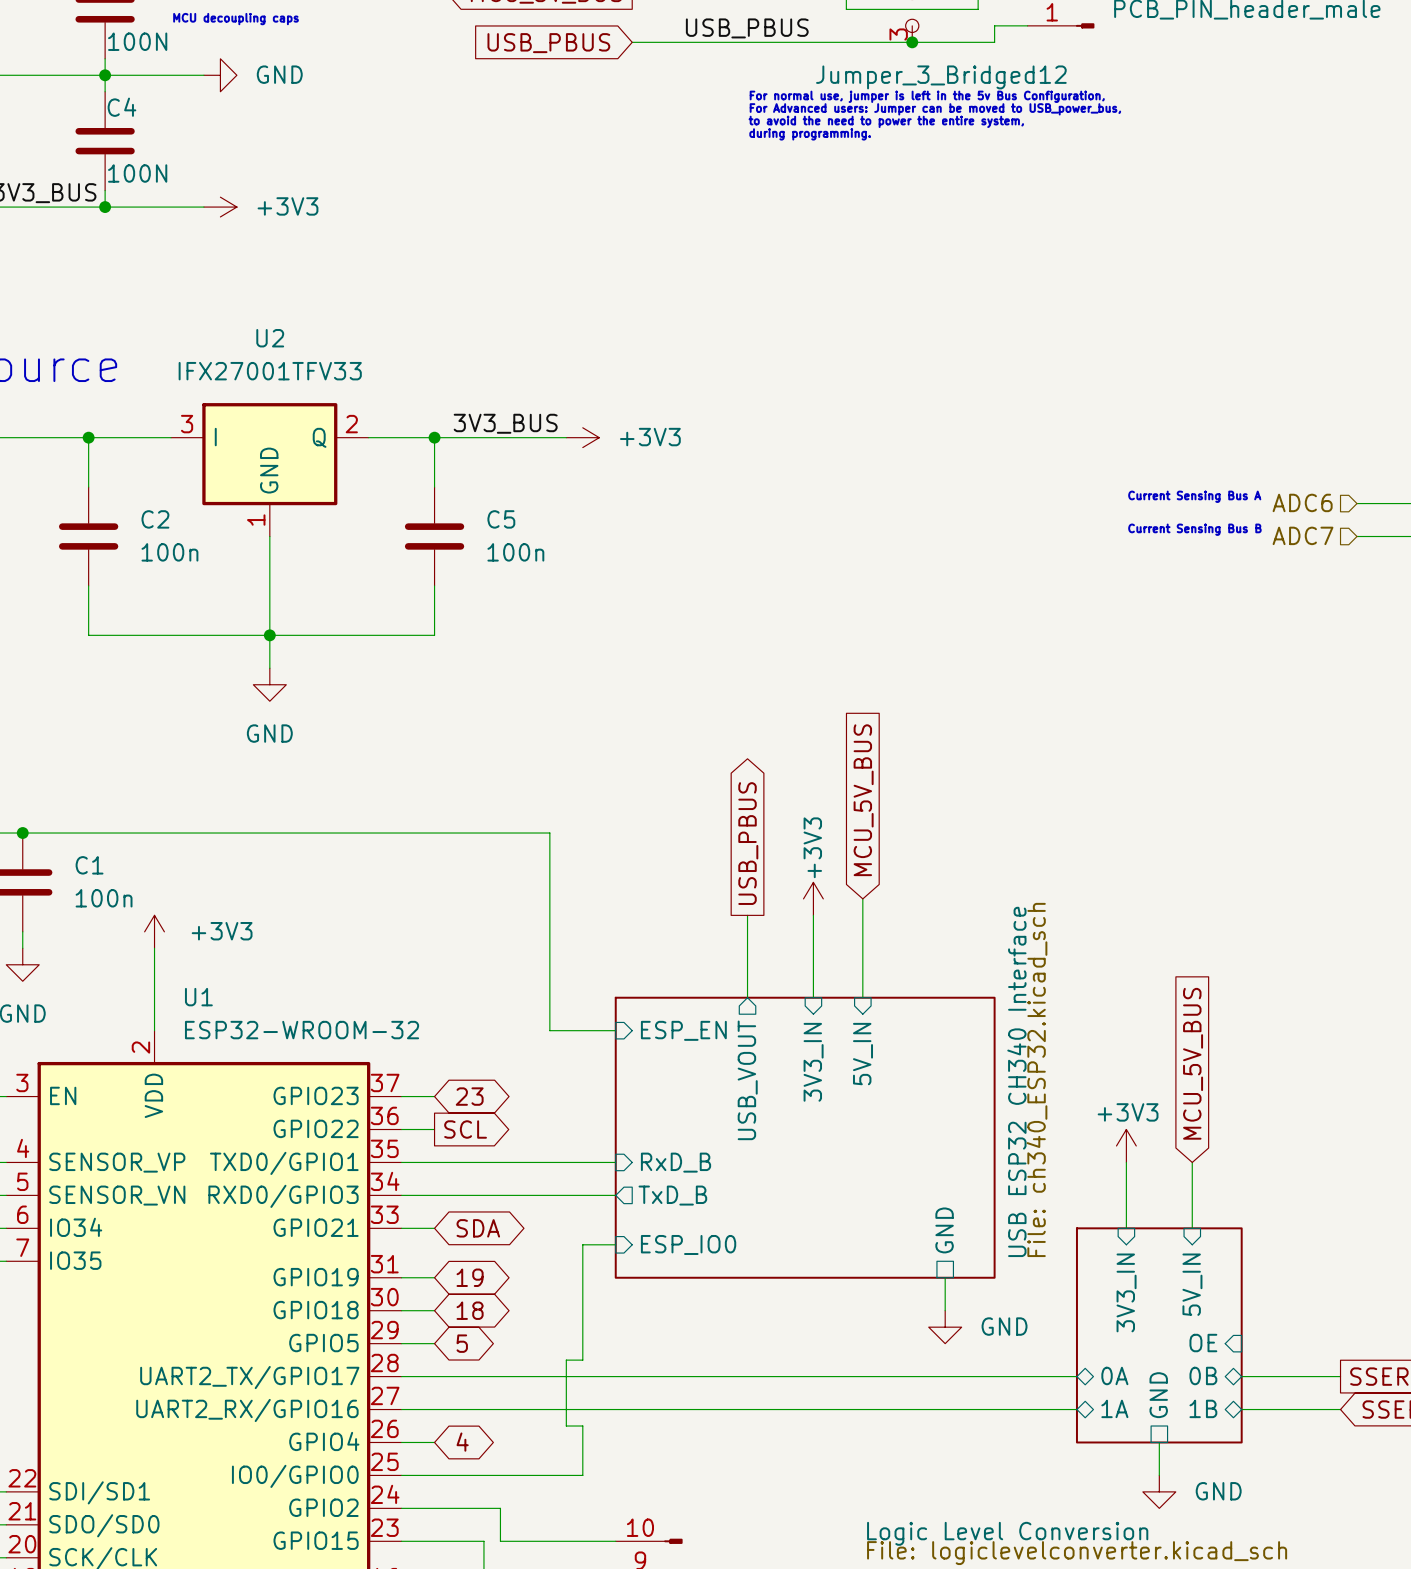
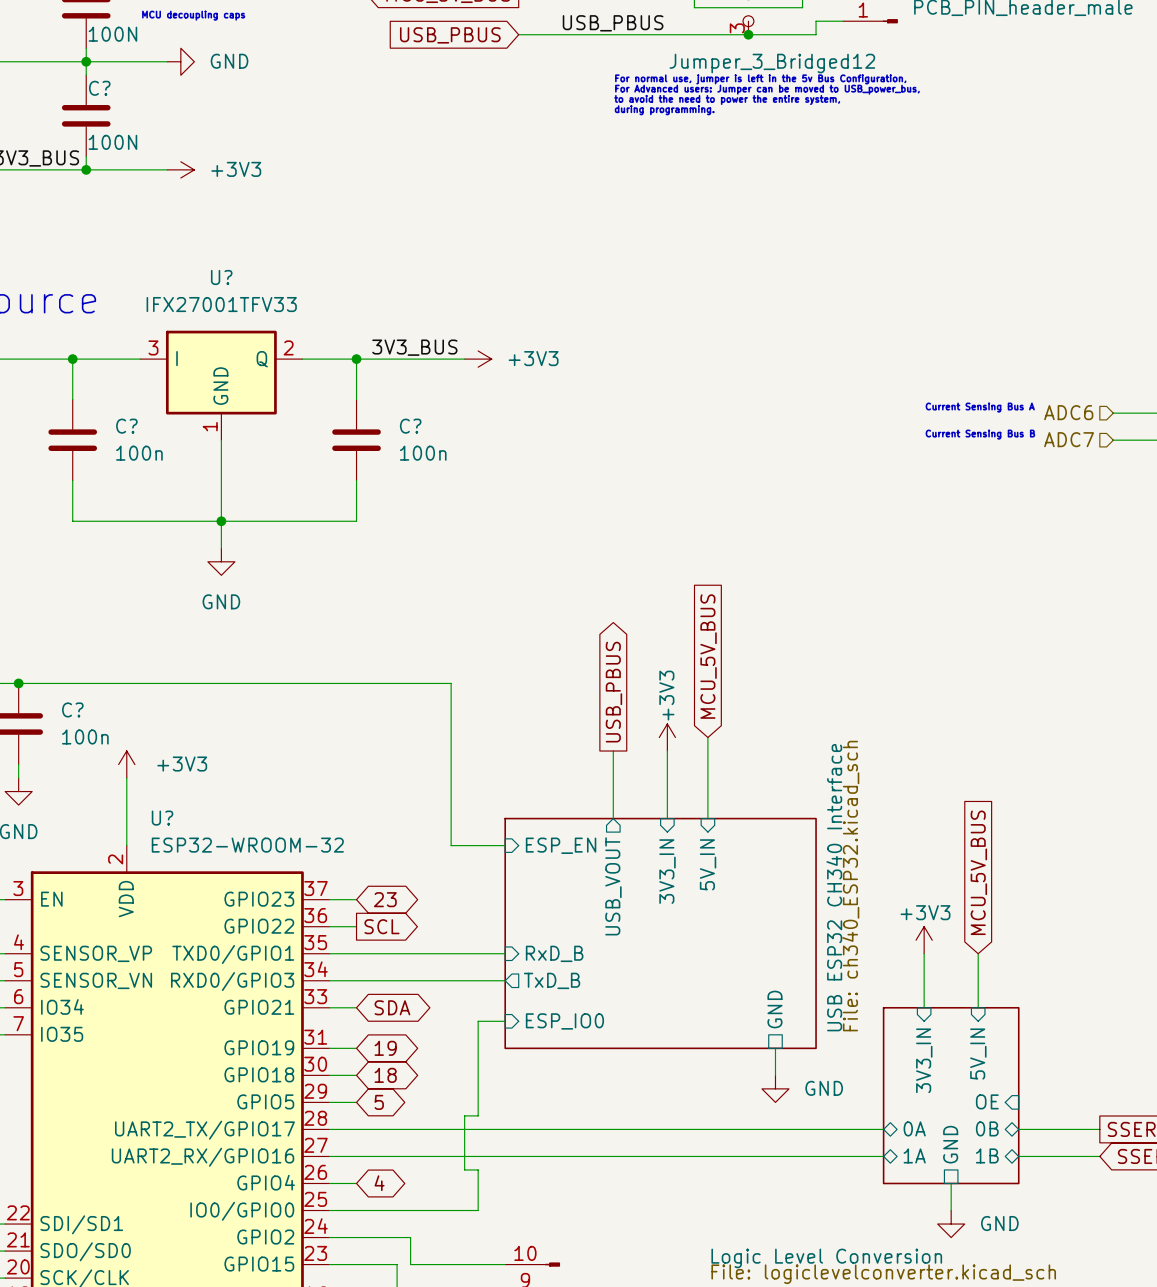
C4 name: C4 (121, 107) -> C? (99, 88)
U2 name: U2 (270, 338) -> U? (221, 277)
C2 name: C2 (155, 519) -> C? (126, 426)
C5 name: C5 (501, 519) -> C? (410, 426)
C1 name: C1 (89, 865) -> C? (72, 709)
U1 name: U1 (198, 997) -> U? (162, 818)

